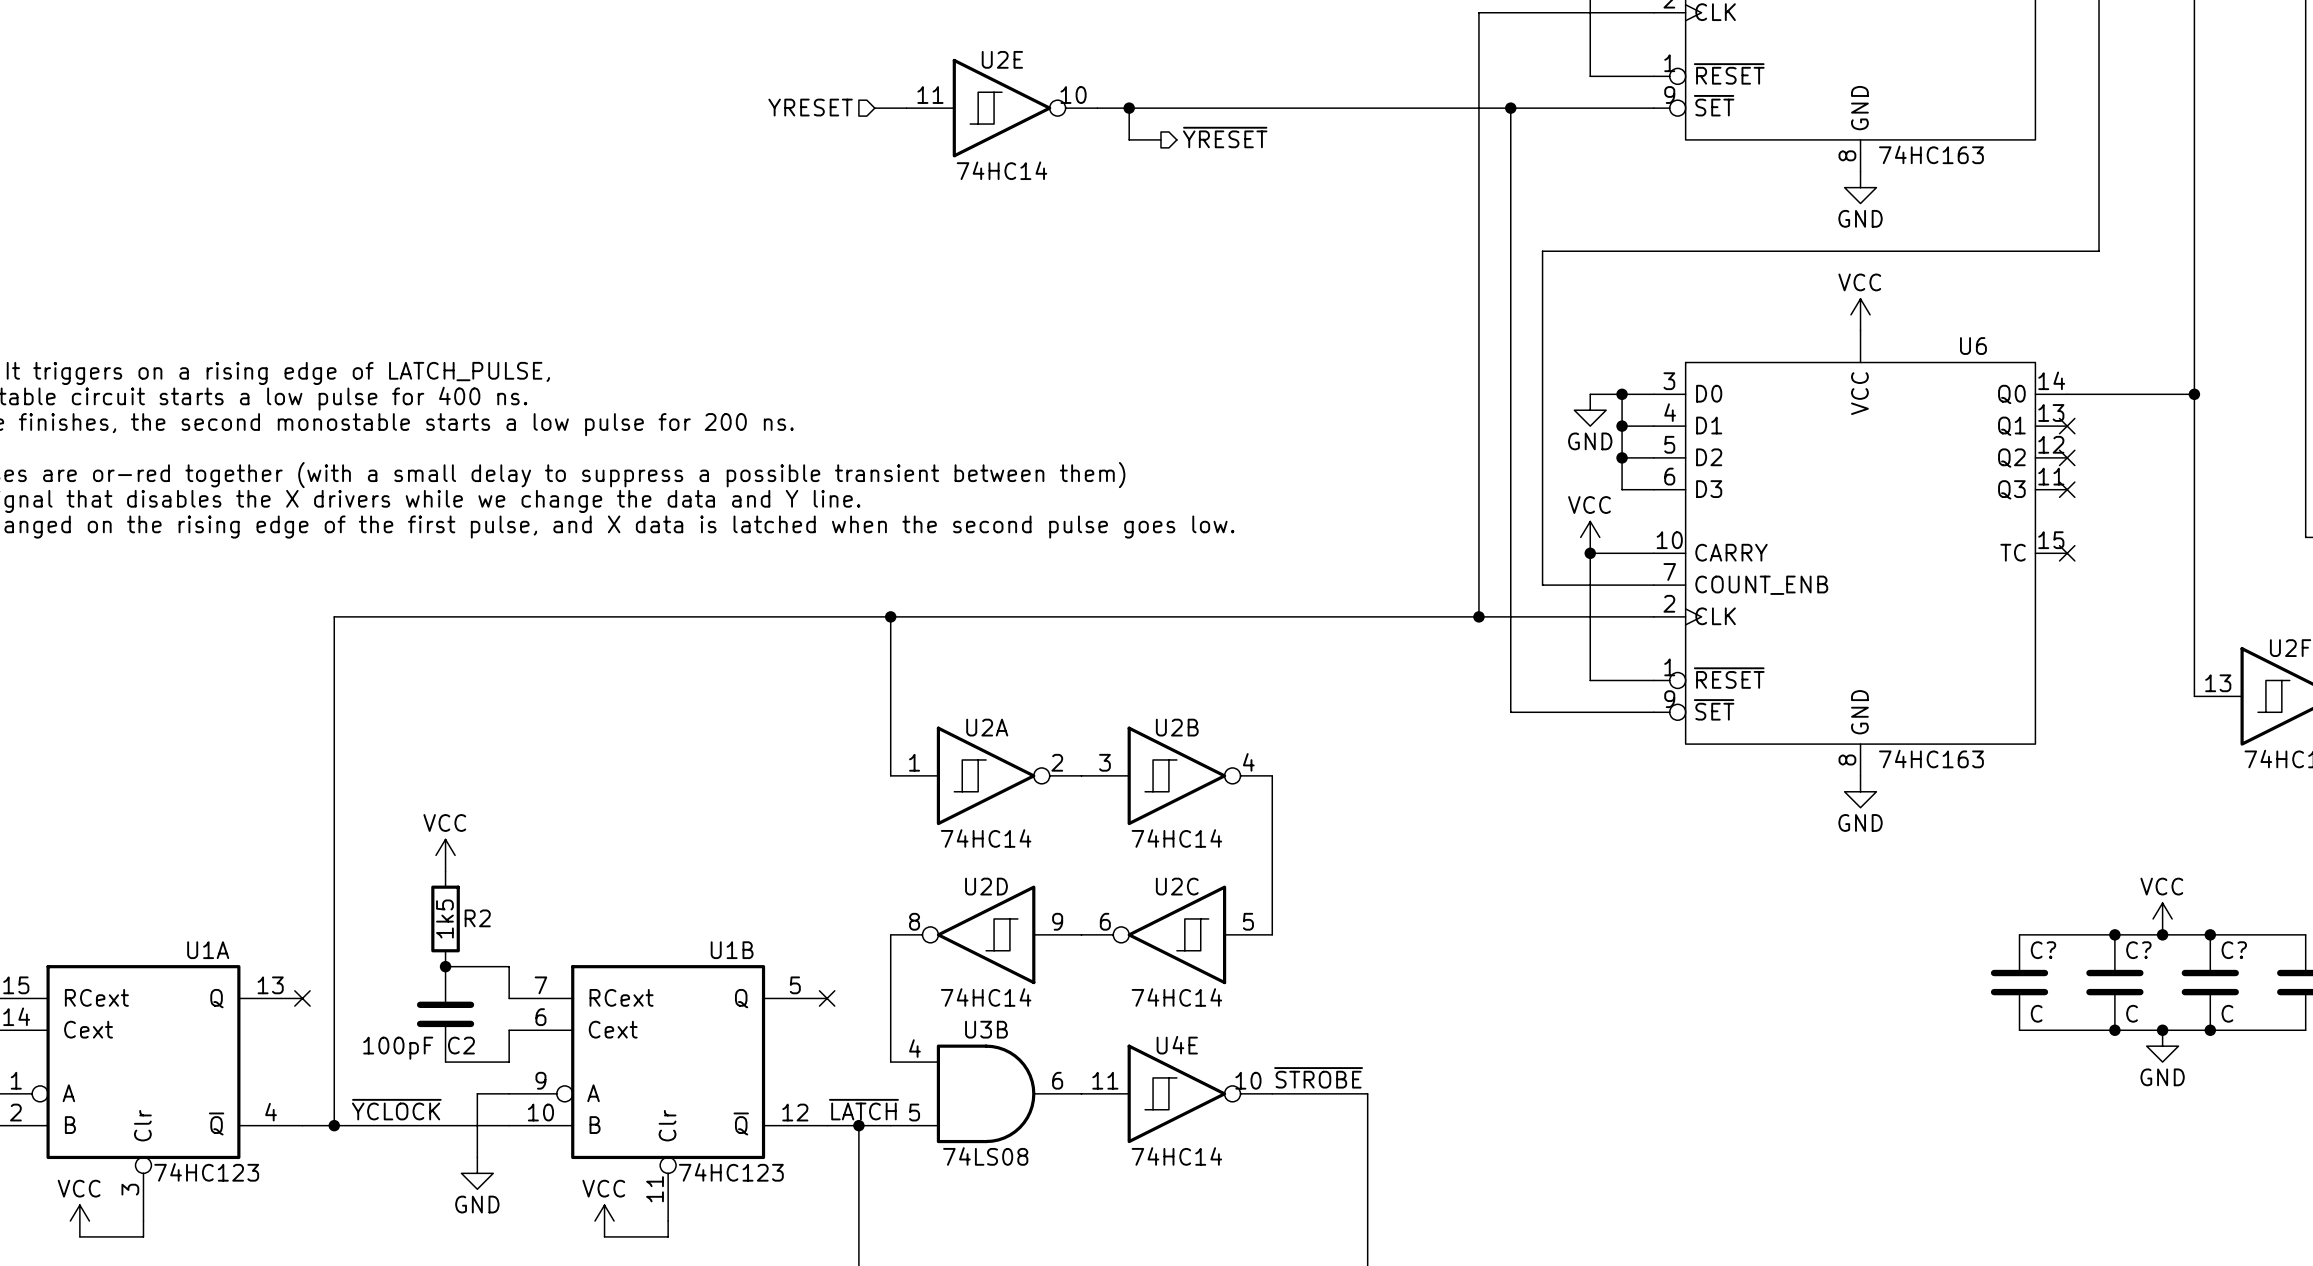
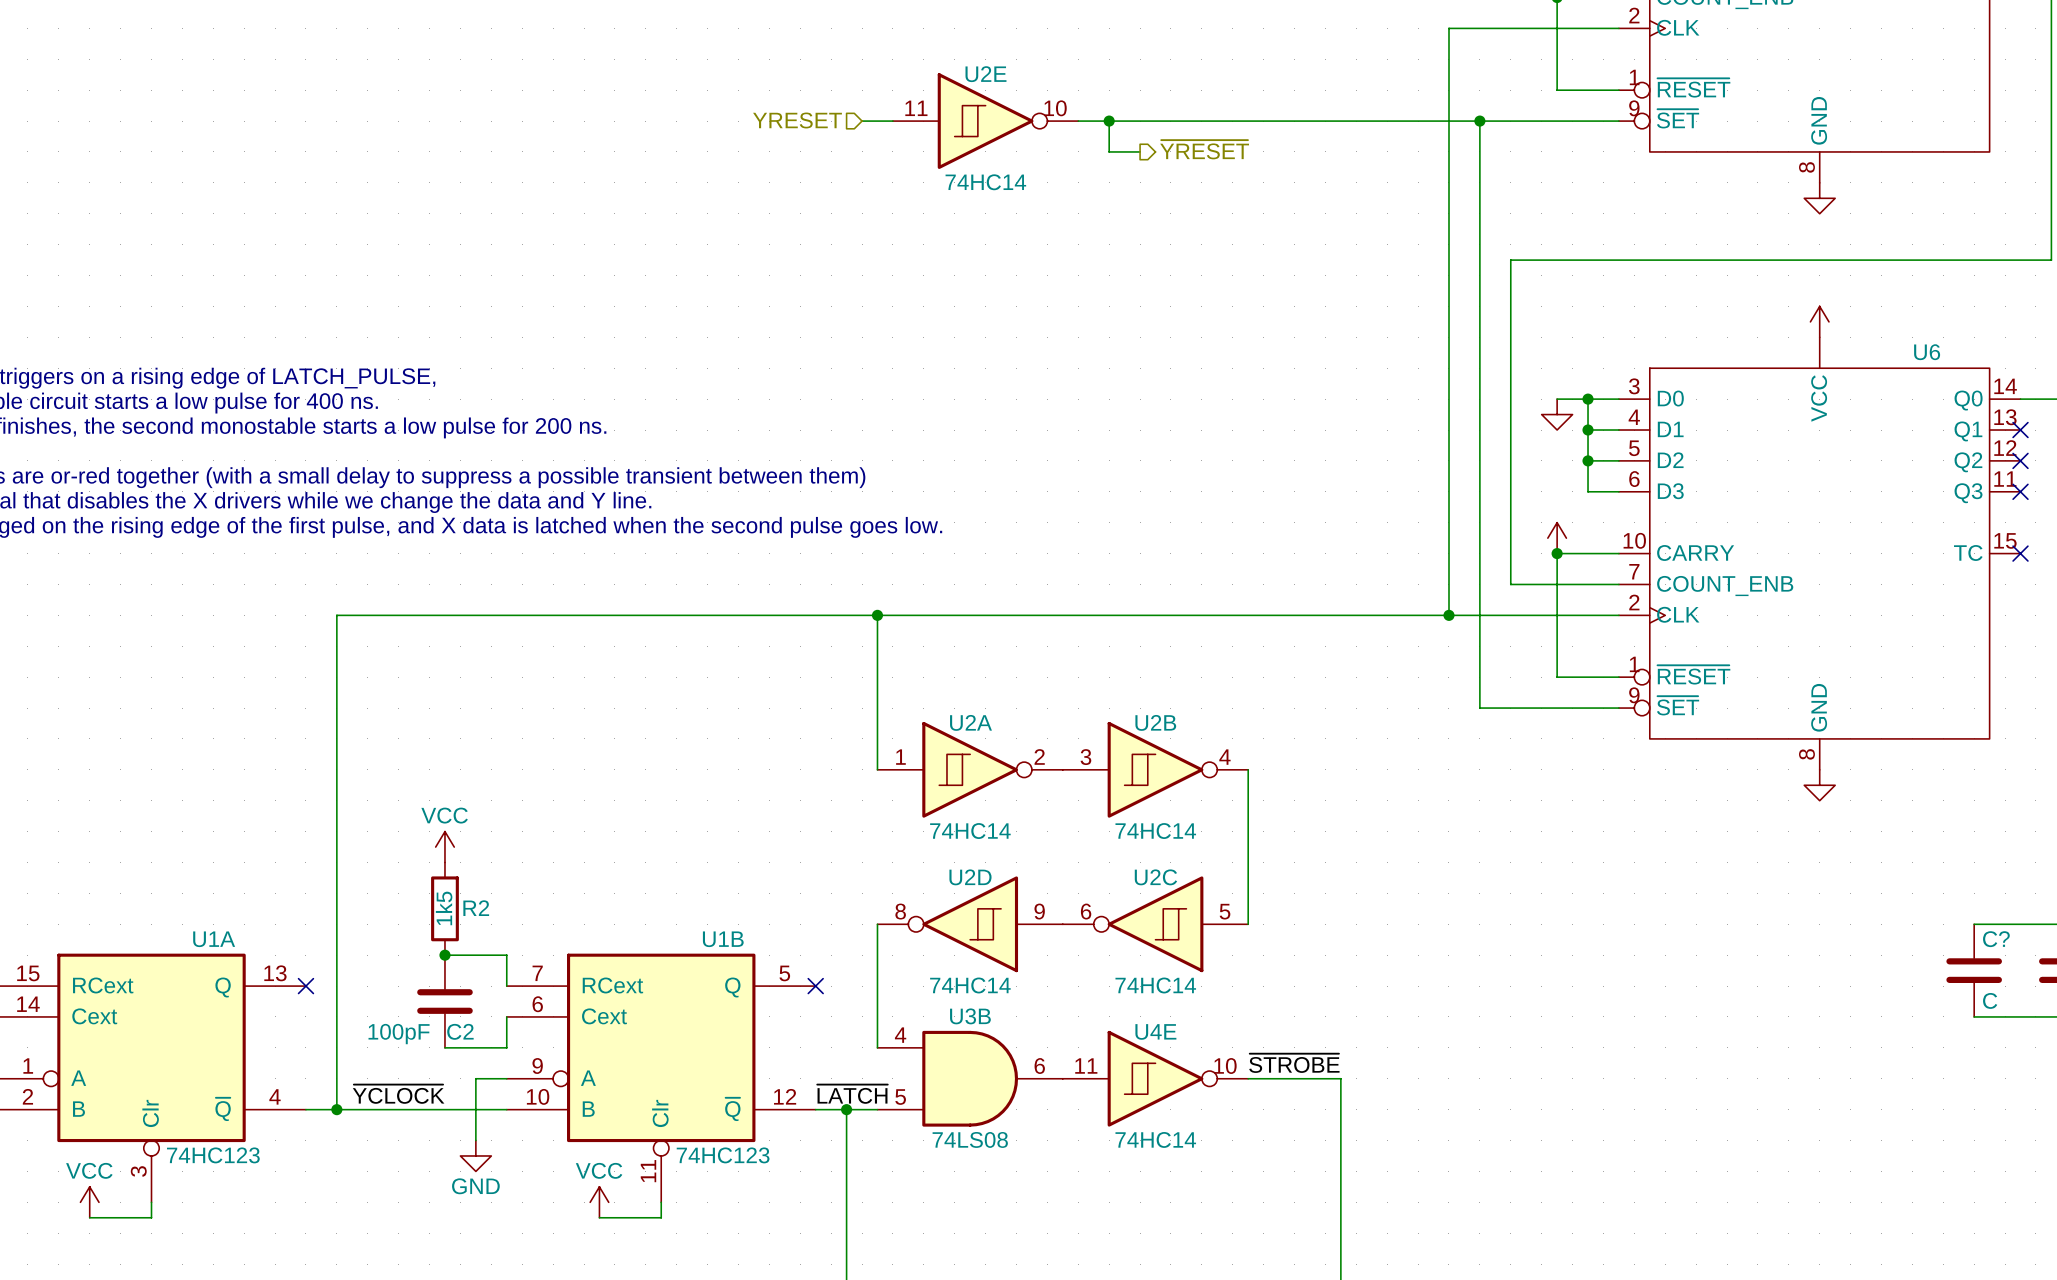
part value: 74HC163 (1931, 154) -> none
power symbol text: GND (1860, 218) -> none
power symbol text: VCC (1859, 282) -> none
power symbol text: GND (1590, 441) -> none
power symbol text: VCC (1589, 505) -> none
U6 value: 74HC163 (1931, 759) -> none
power symbol text: GND (1860, 822) -> none

